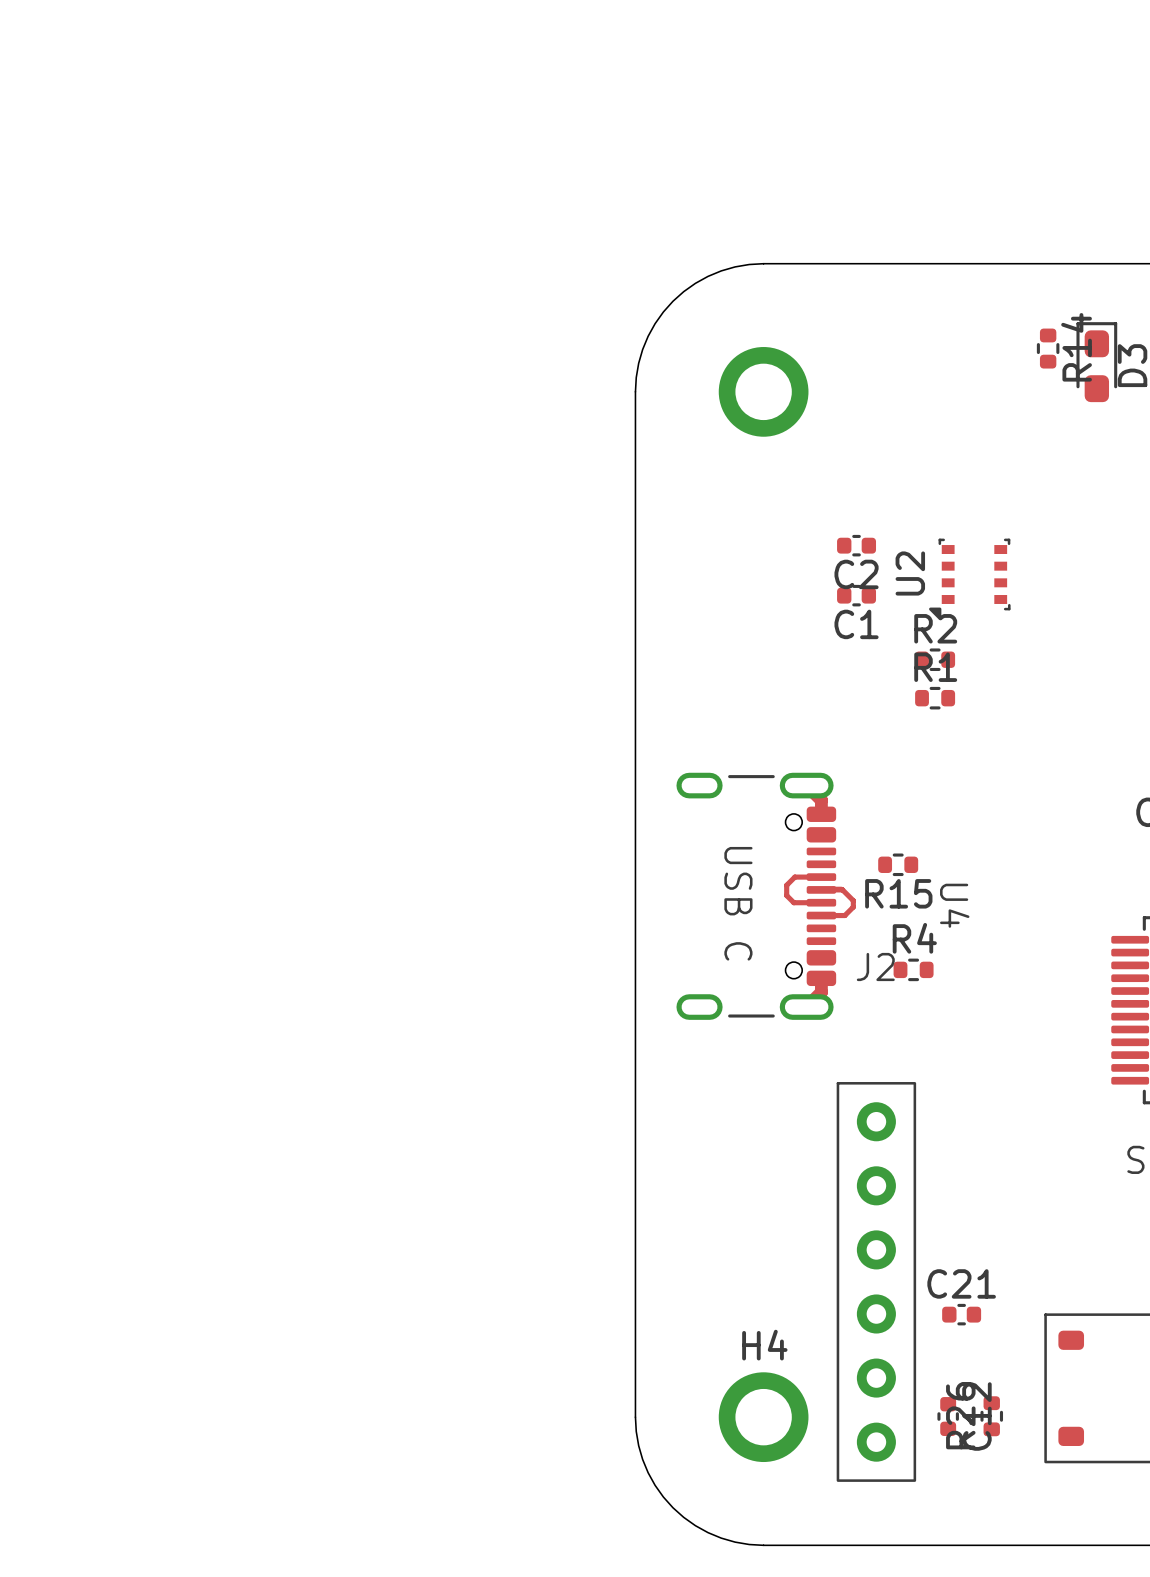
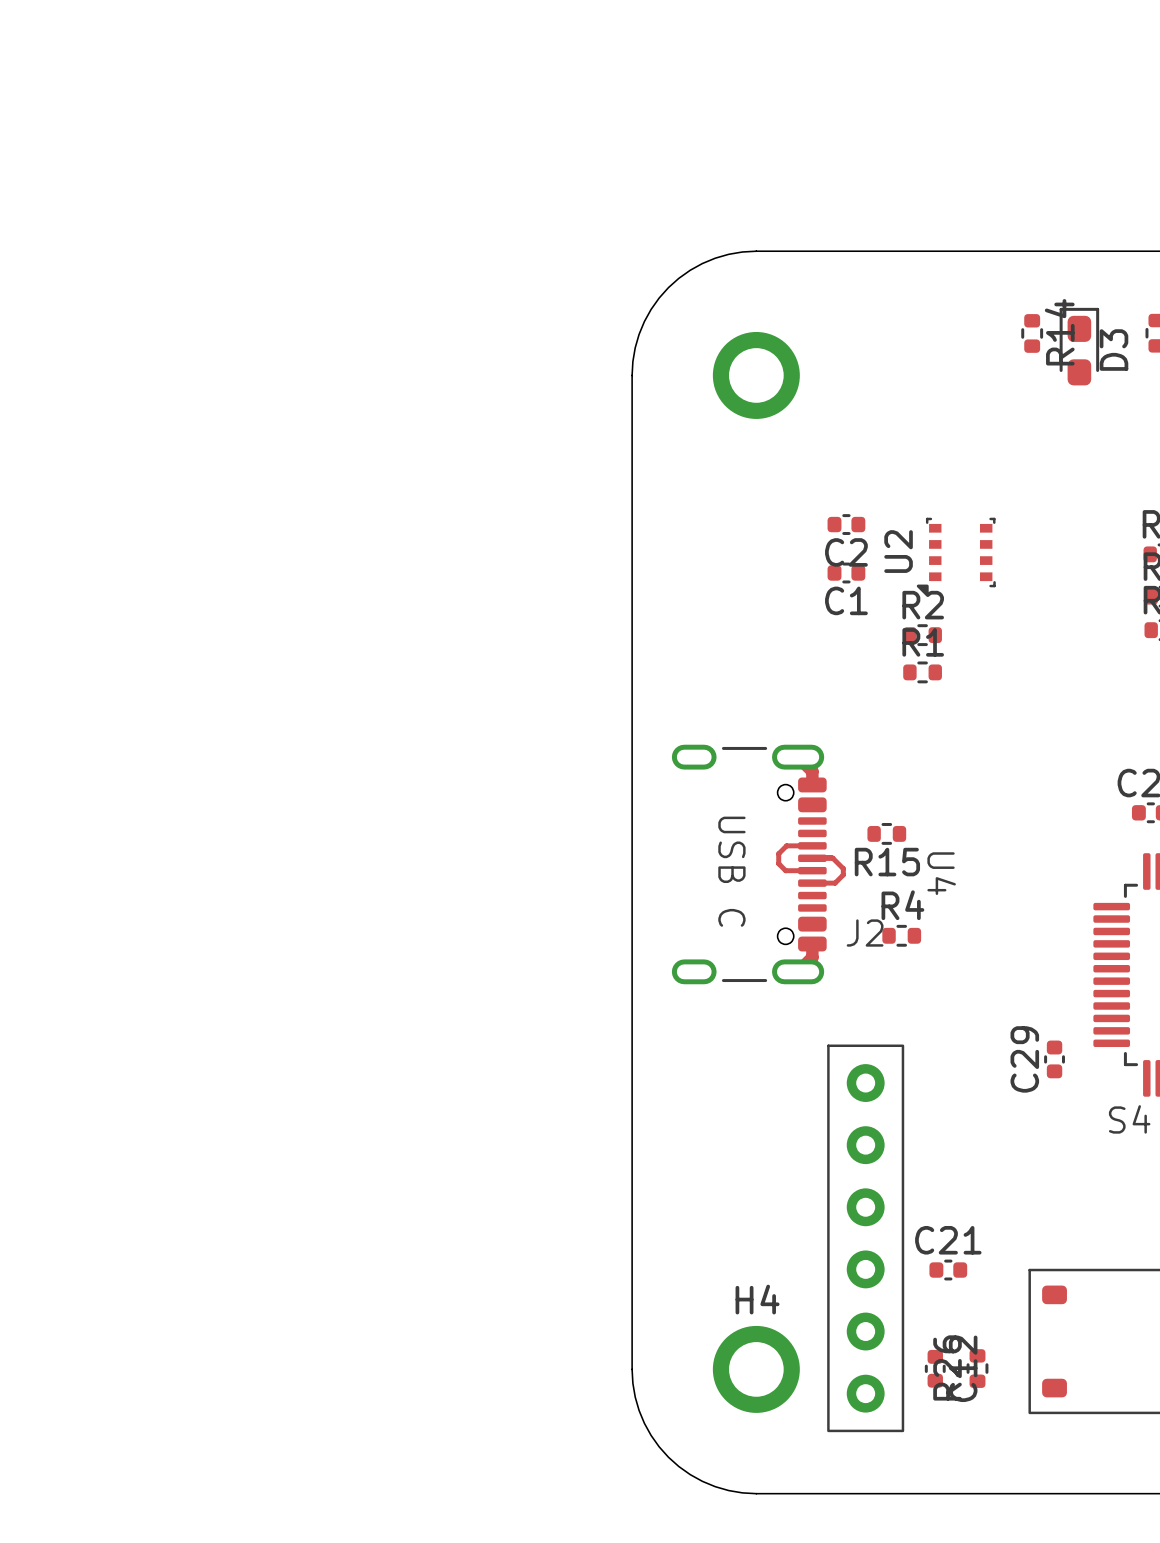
C29: none -> (1054, 1059)

